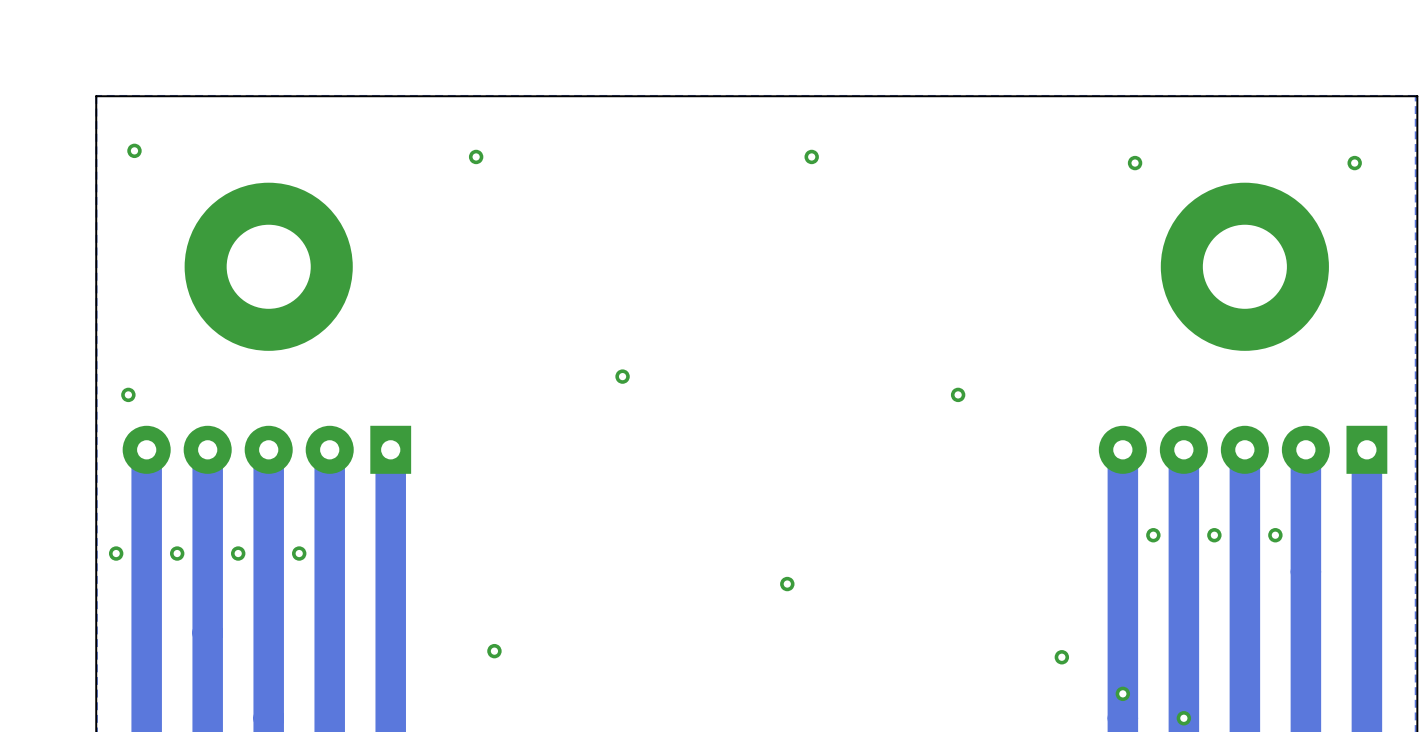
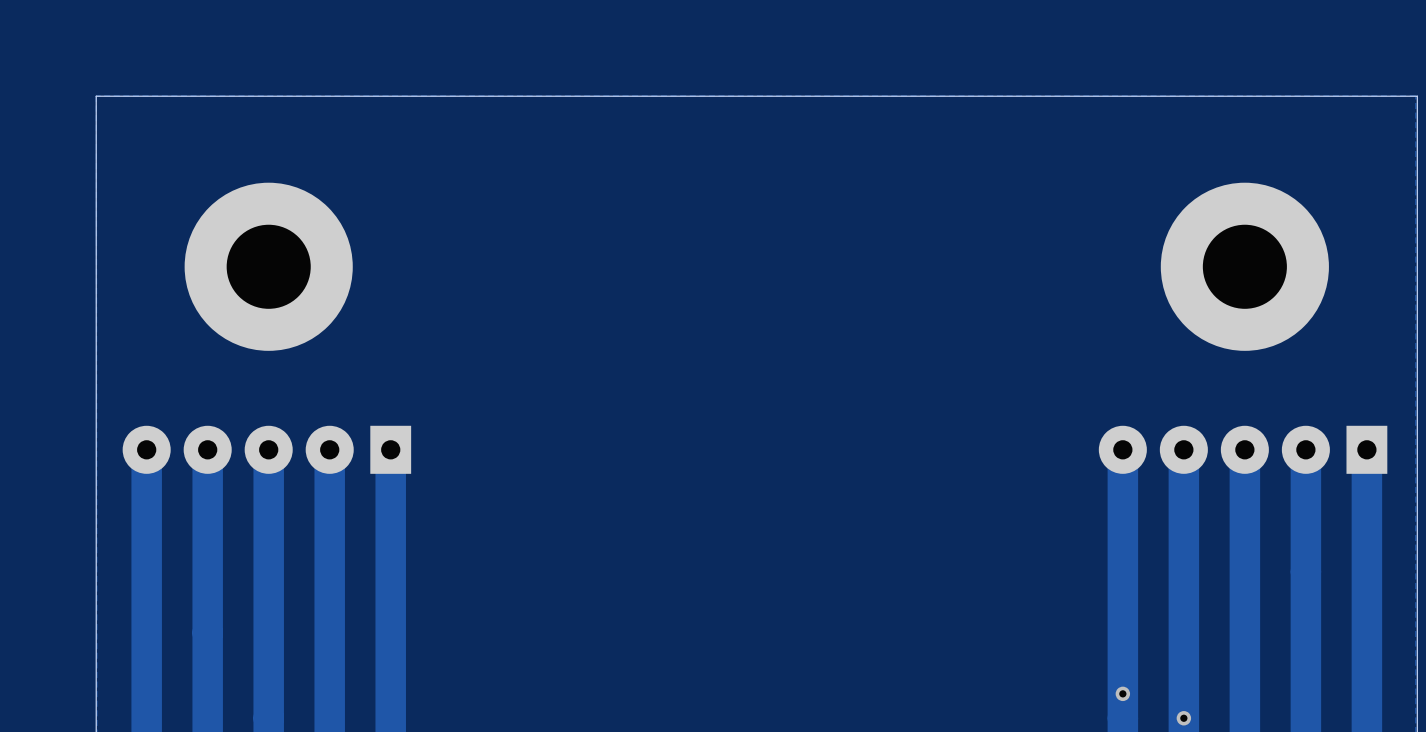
via: (134, 150) -> none
via: (476, 156) -> none
via: (811, 156) -> none
via: (1135, 163) -> none
via: (1354, 163) -> none
via: (622, 376) -> none
via: (128, 394) -> none
via: (958, 394) -> none
via: (1153, 535) -> none
via: (1214, 535) -> none
via: (1275, 535) -> none
via: (116, 553) -> none
via: (177, 553) -> none
via: (238, 553) -> none
via: (299, 553) -> none
via: (787, 584) -> none
via: (494, 651) -> none
via: (1061, 657) -> none

